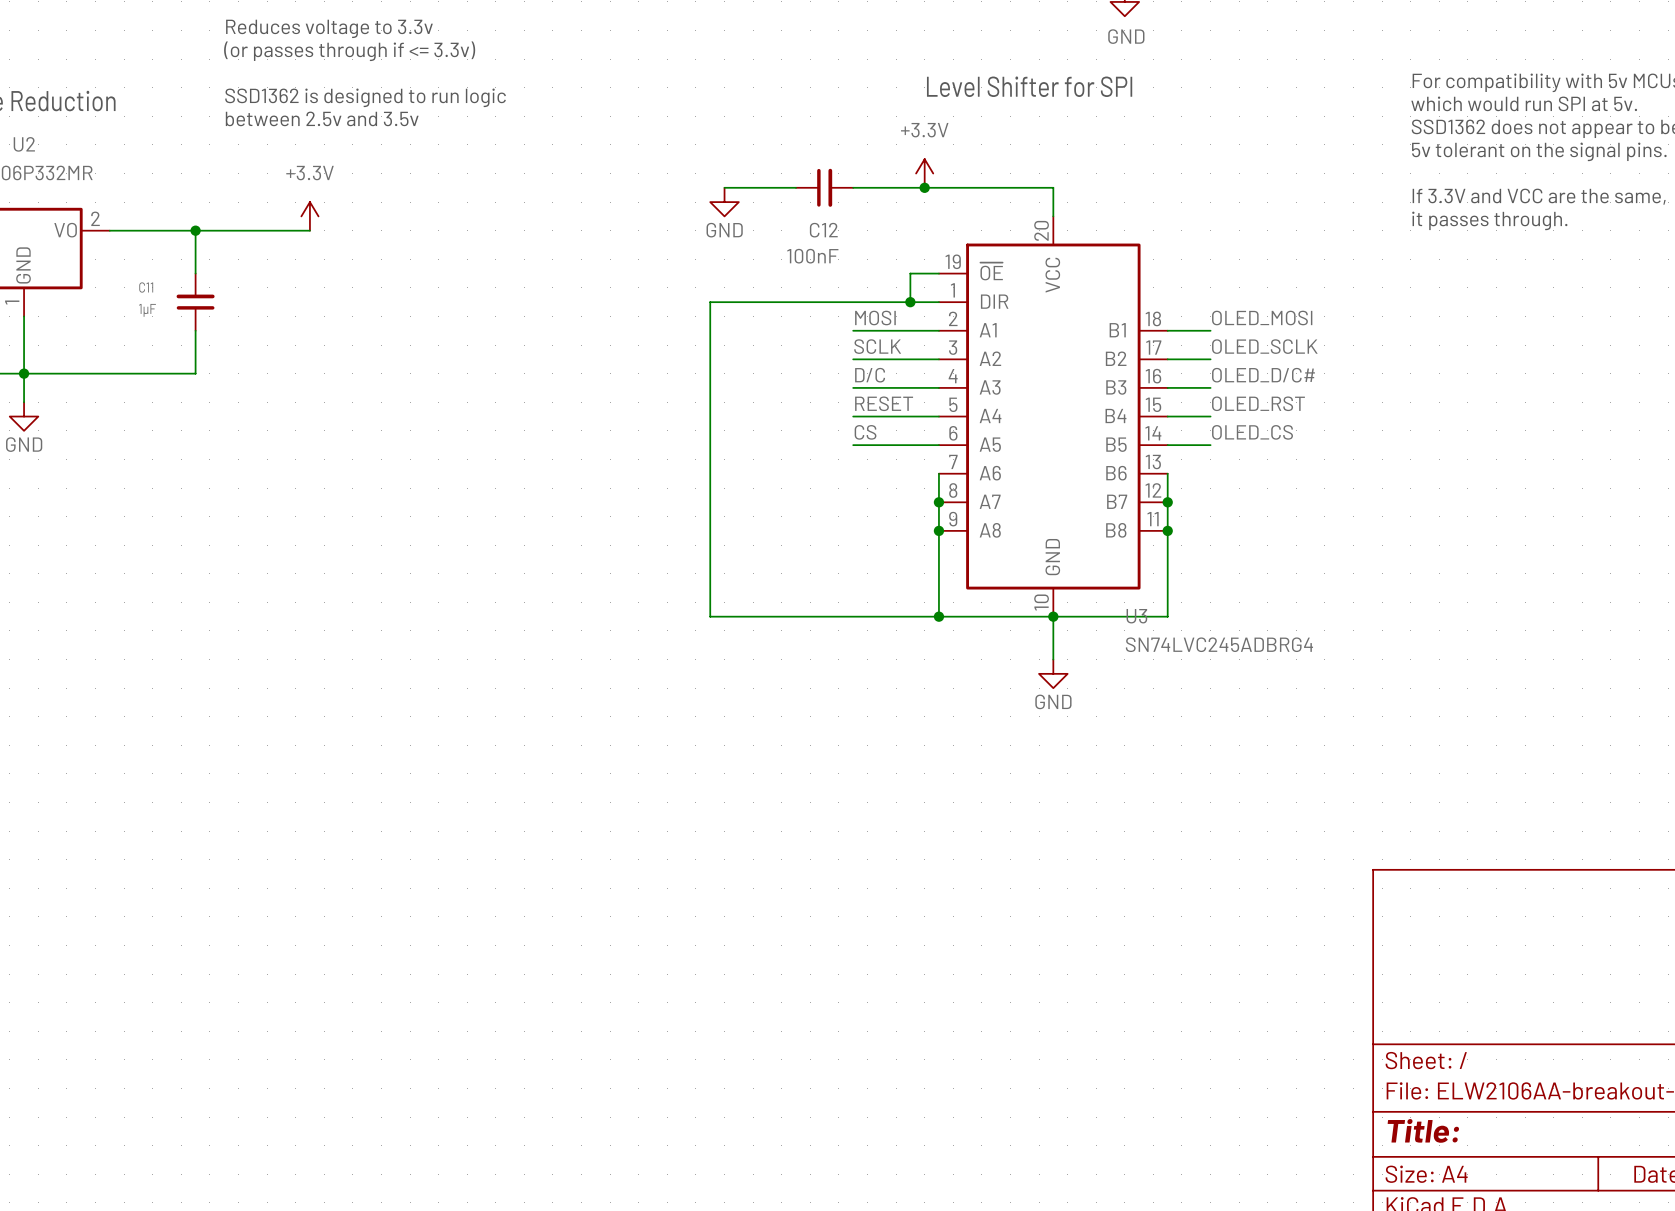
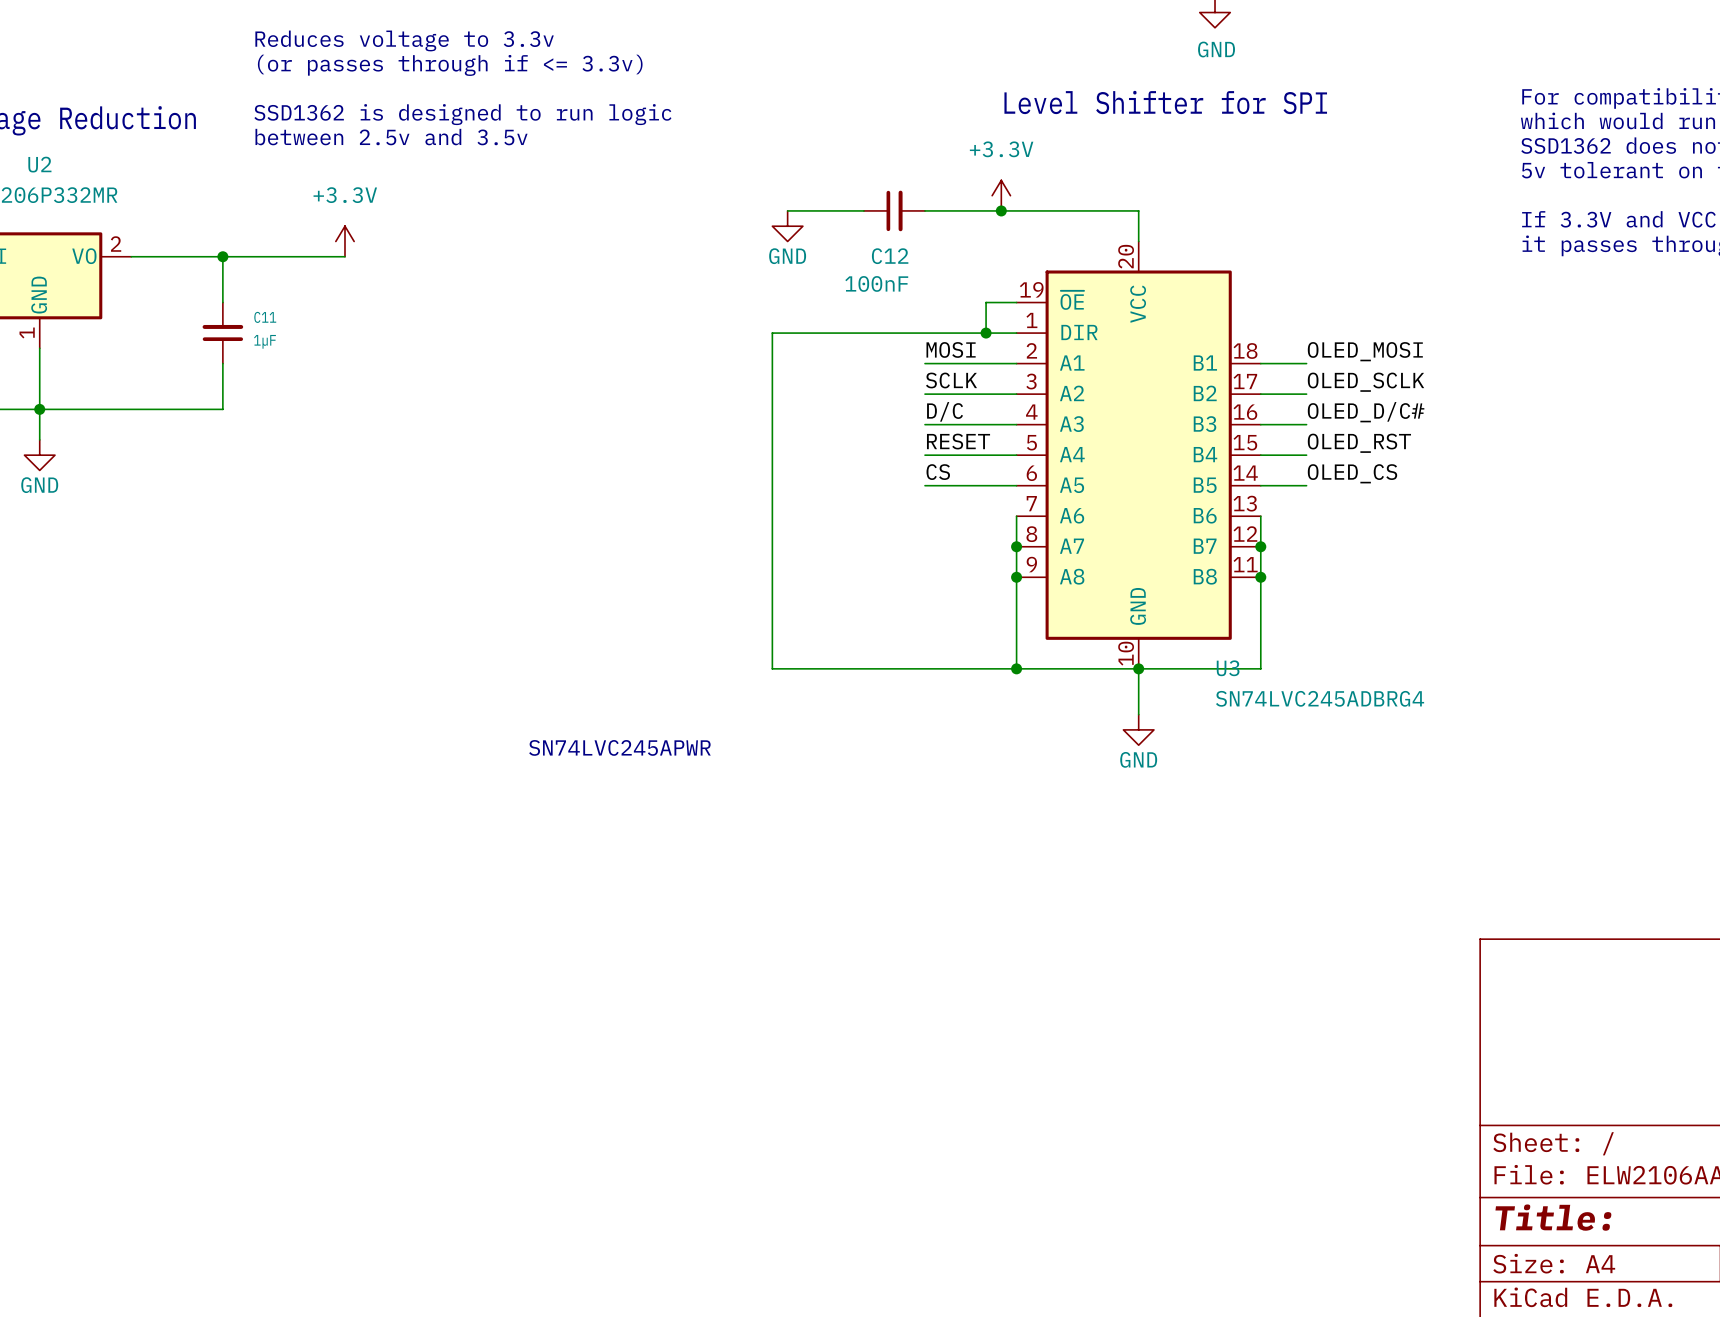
C11 name position: C11 (146, 287) -> C11 (265, 317)
C11 value position: 1µF (147, 310) -> 1µF (265, 341)
text: none -> SN74LVC245APWR (619, 747)

